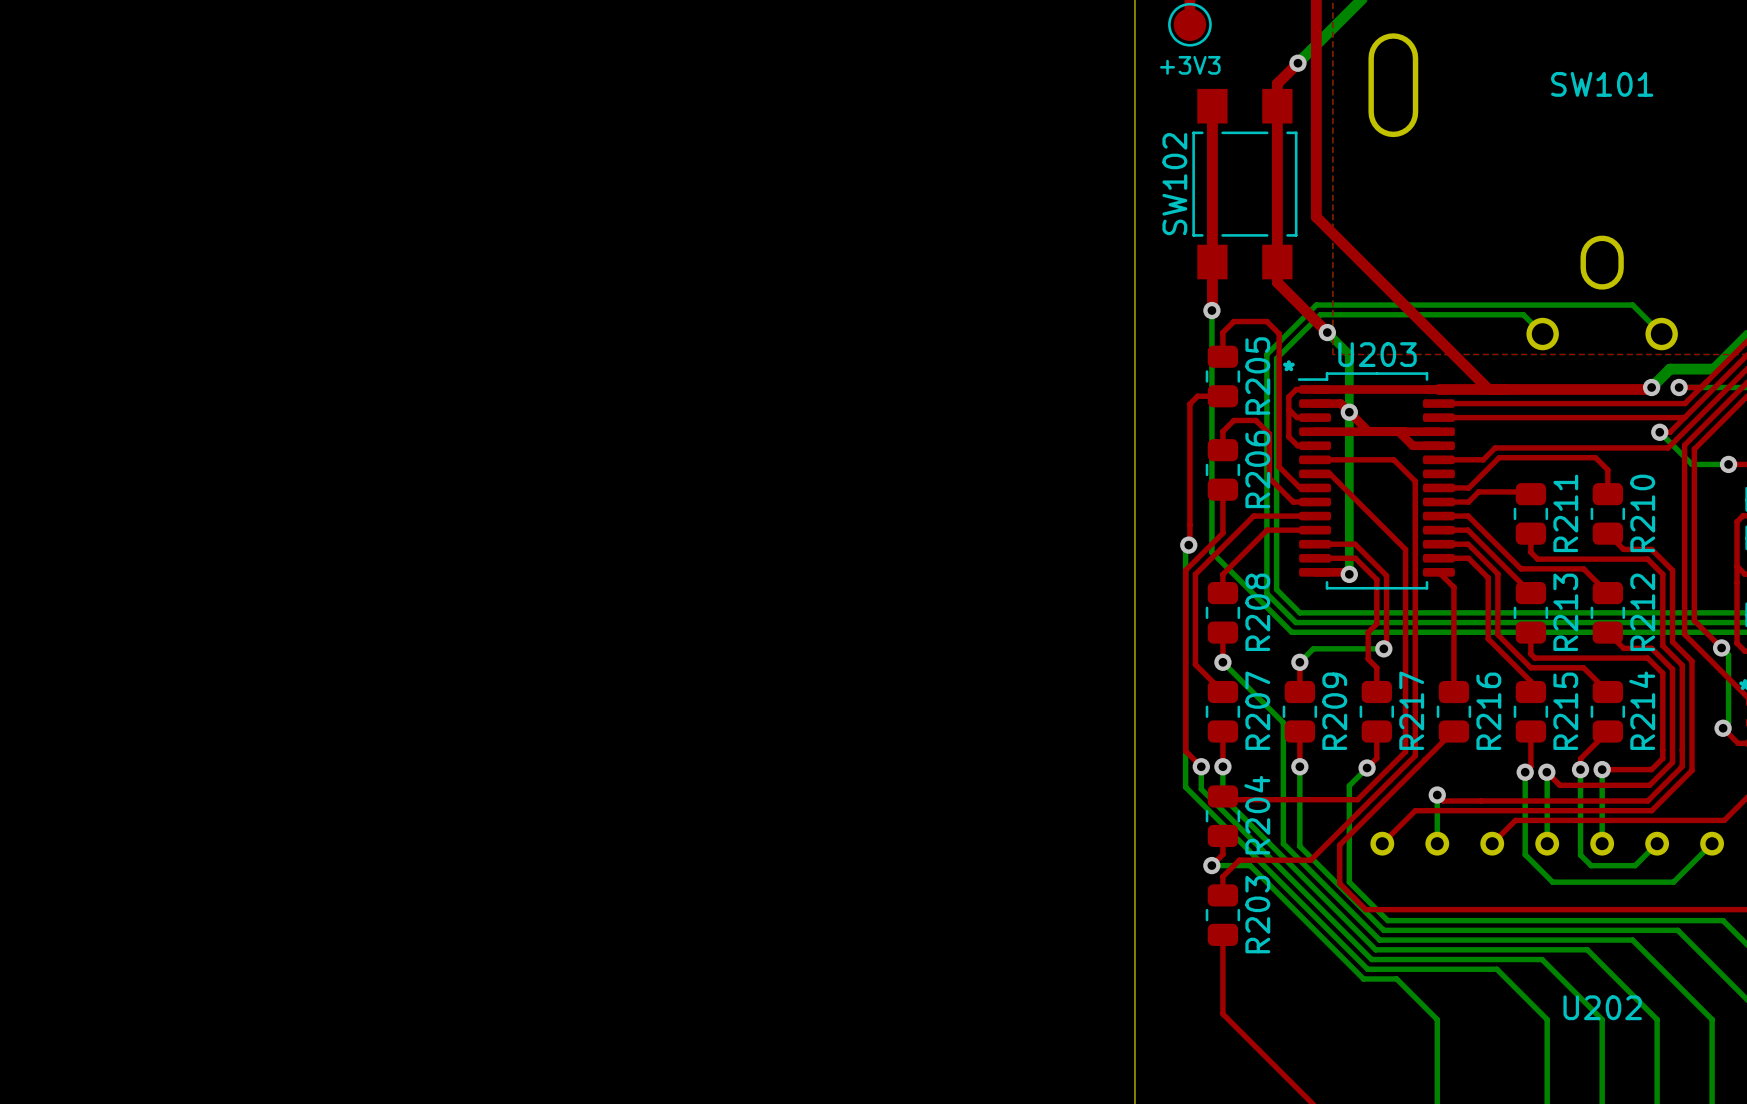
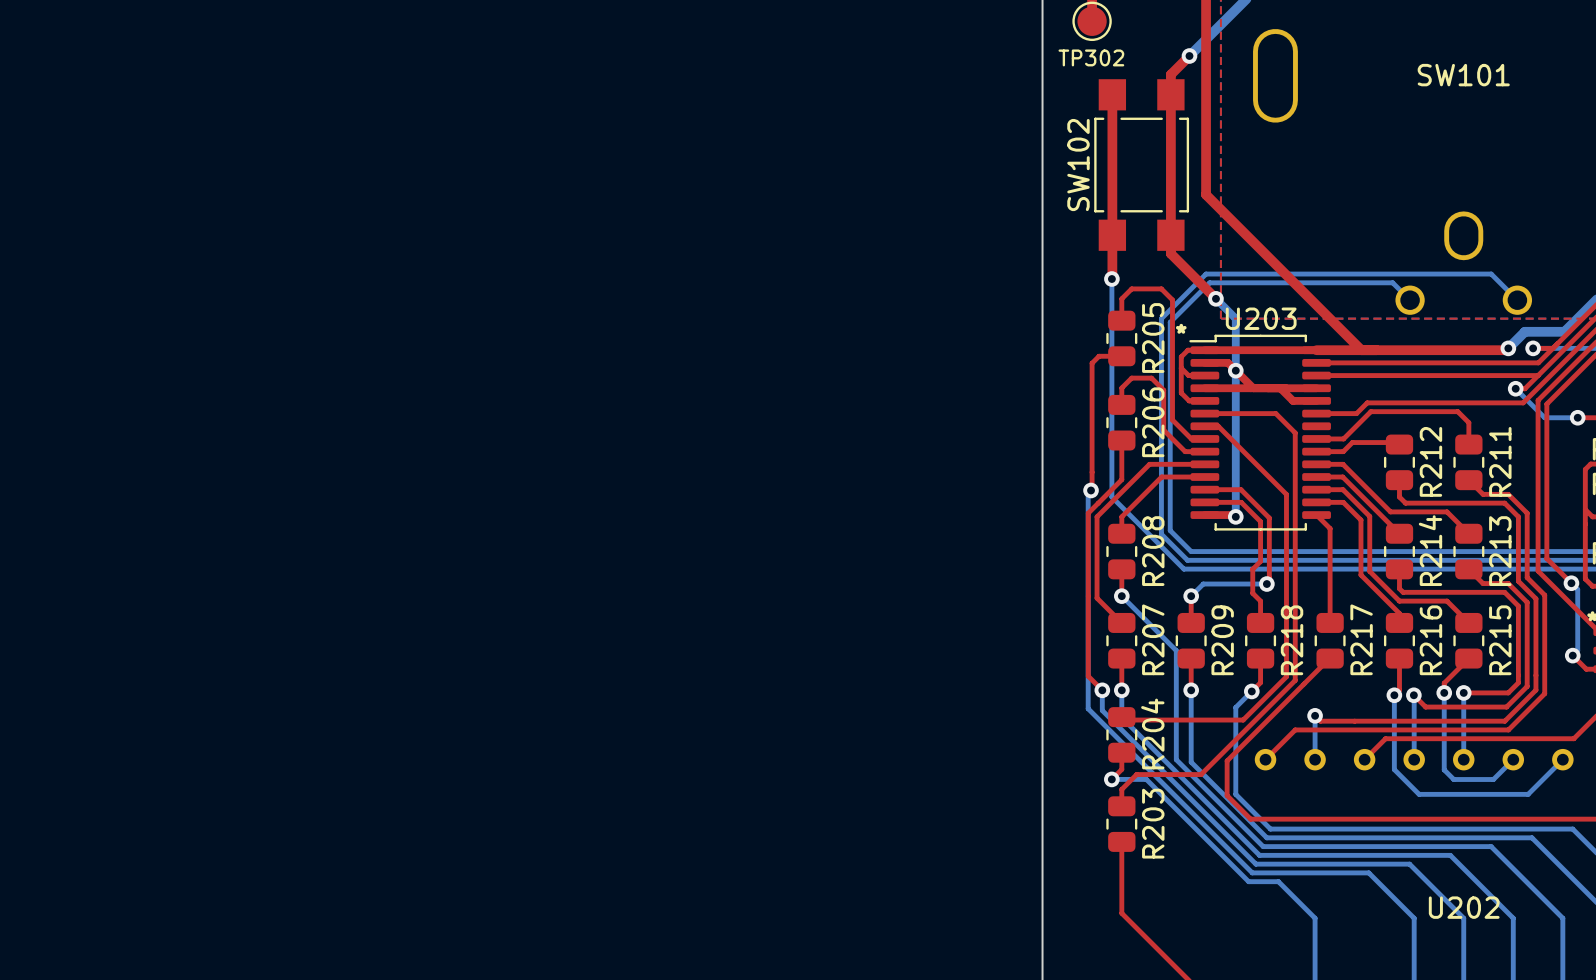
+3V3 name: +3V3 (1190, 65) -> TP302 (1091, 57)
R211 name: R211 (1565, 513) -> R212 (1430, 461)
R210 name: R210 (1642, 513) -> R211 (1500, 461)
R213 name: R213 (1565, 612) -> R214 (1430, 550)
R212 name: R212 (1642, 612) -> R213 (1500, 551)
R217 name: R217 (1411, 710) -> R218 (1292, 640)
R214 name: R214 (1642, 710) -> R215 (1500, 640)
R216 name: R216 (1488, 711) -> R217 (1361, 639)
R215 name: R215 (1565, 711) -> R216 (1430, 640)

